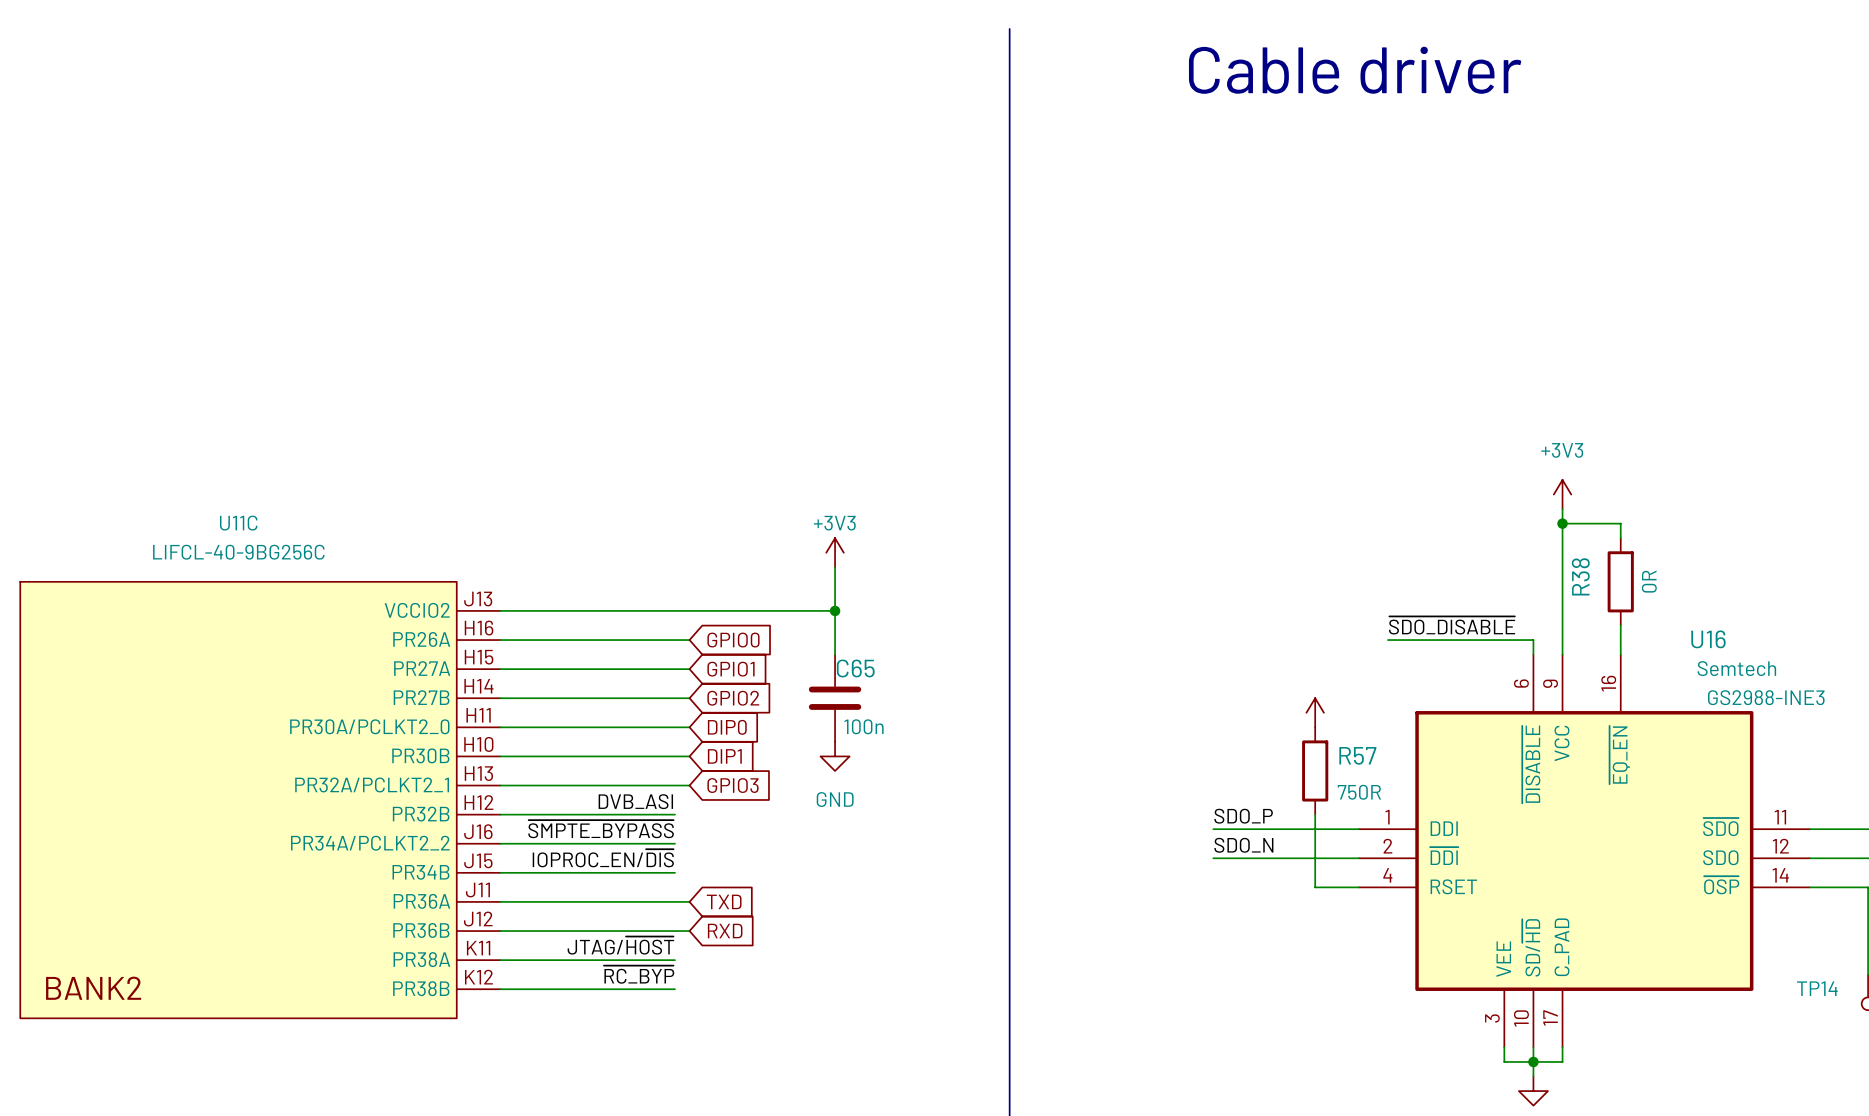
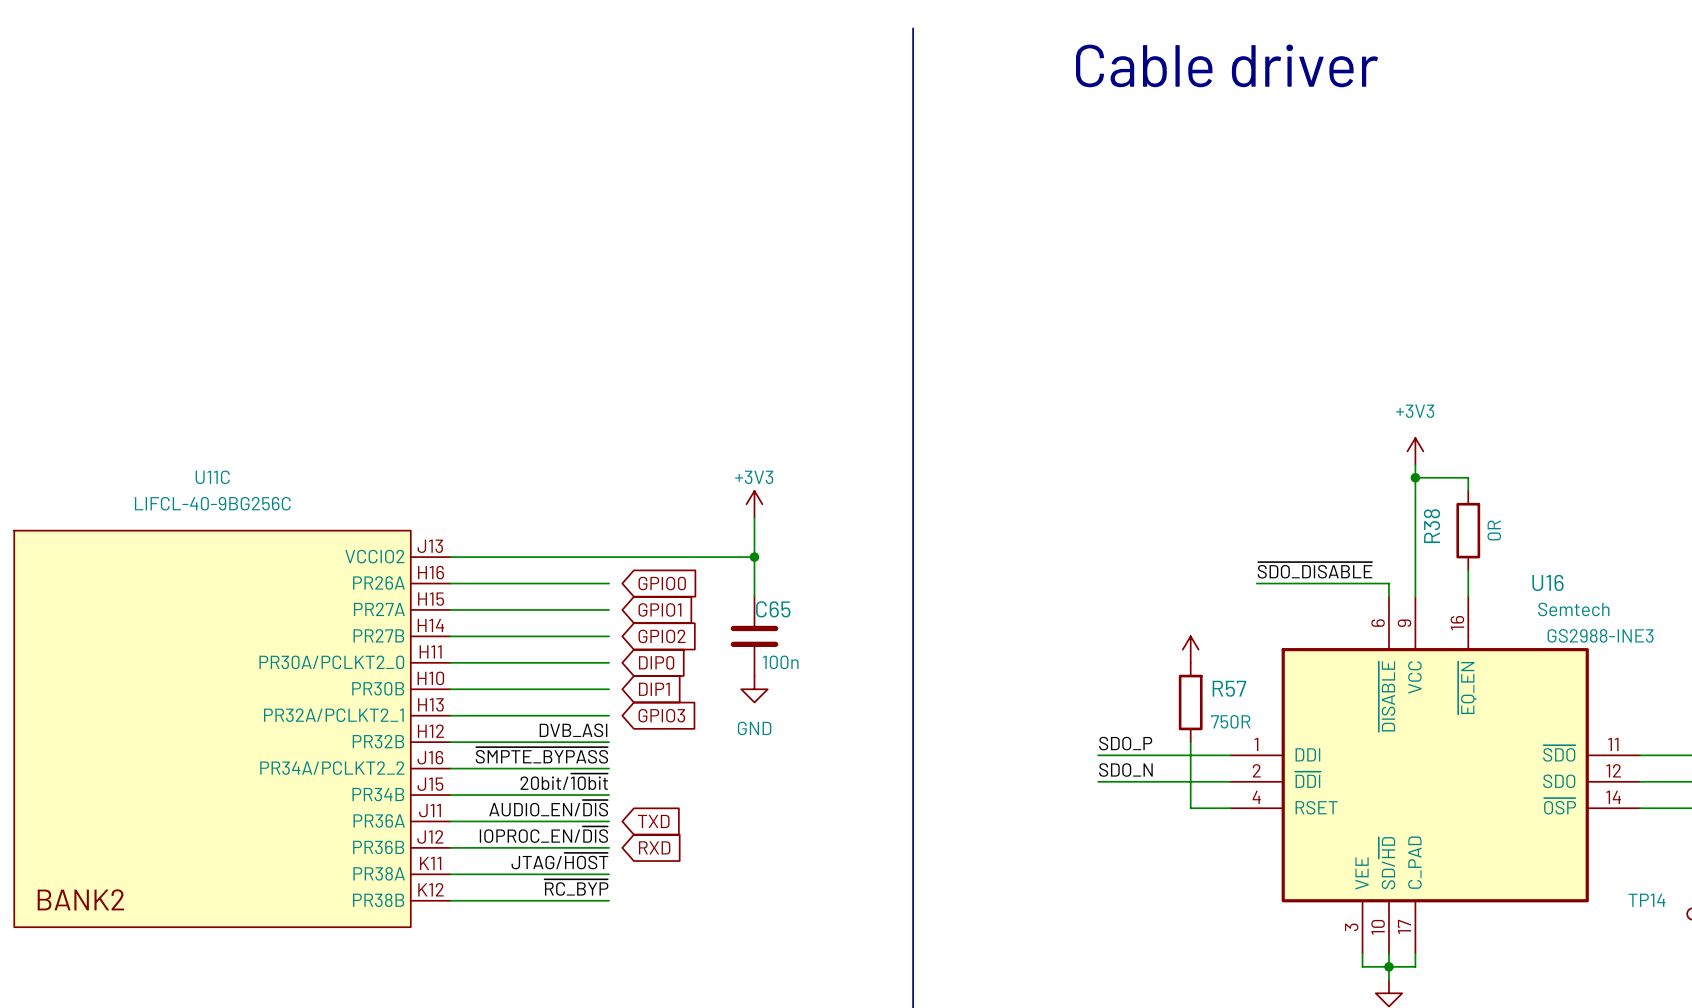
wire: (675, 640) (689, 640) -> none
wire: (675, 669) (689, 669) -> none
wire: (675, 698) (689, 698) -> none
wire: (675, 727) (689, 727) -> none
wire: (675, 756) (689, 756) -> none
wire: (675, 785) (689, 785) -> none
label: IOPROC_EN/~{DIS} (603, 858) -> 20bit/~{10bit} (564, 781)
label: none -> AUDIO_EN/~{DIS} (548, 808)
wire: (675, 901) (689, 901) -> none
label: none -> IOPROC_EN/~{DIS} (543, 834)
wire: (675, 931) (689, 931) -> none

